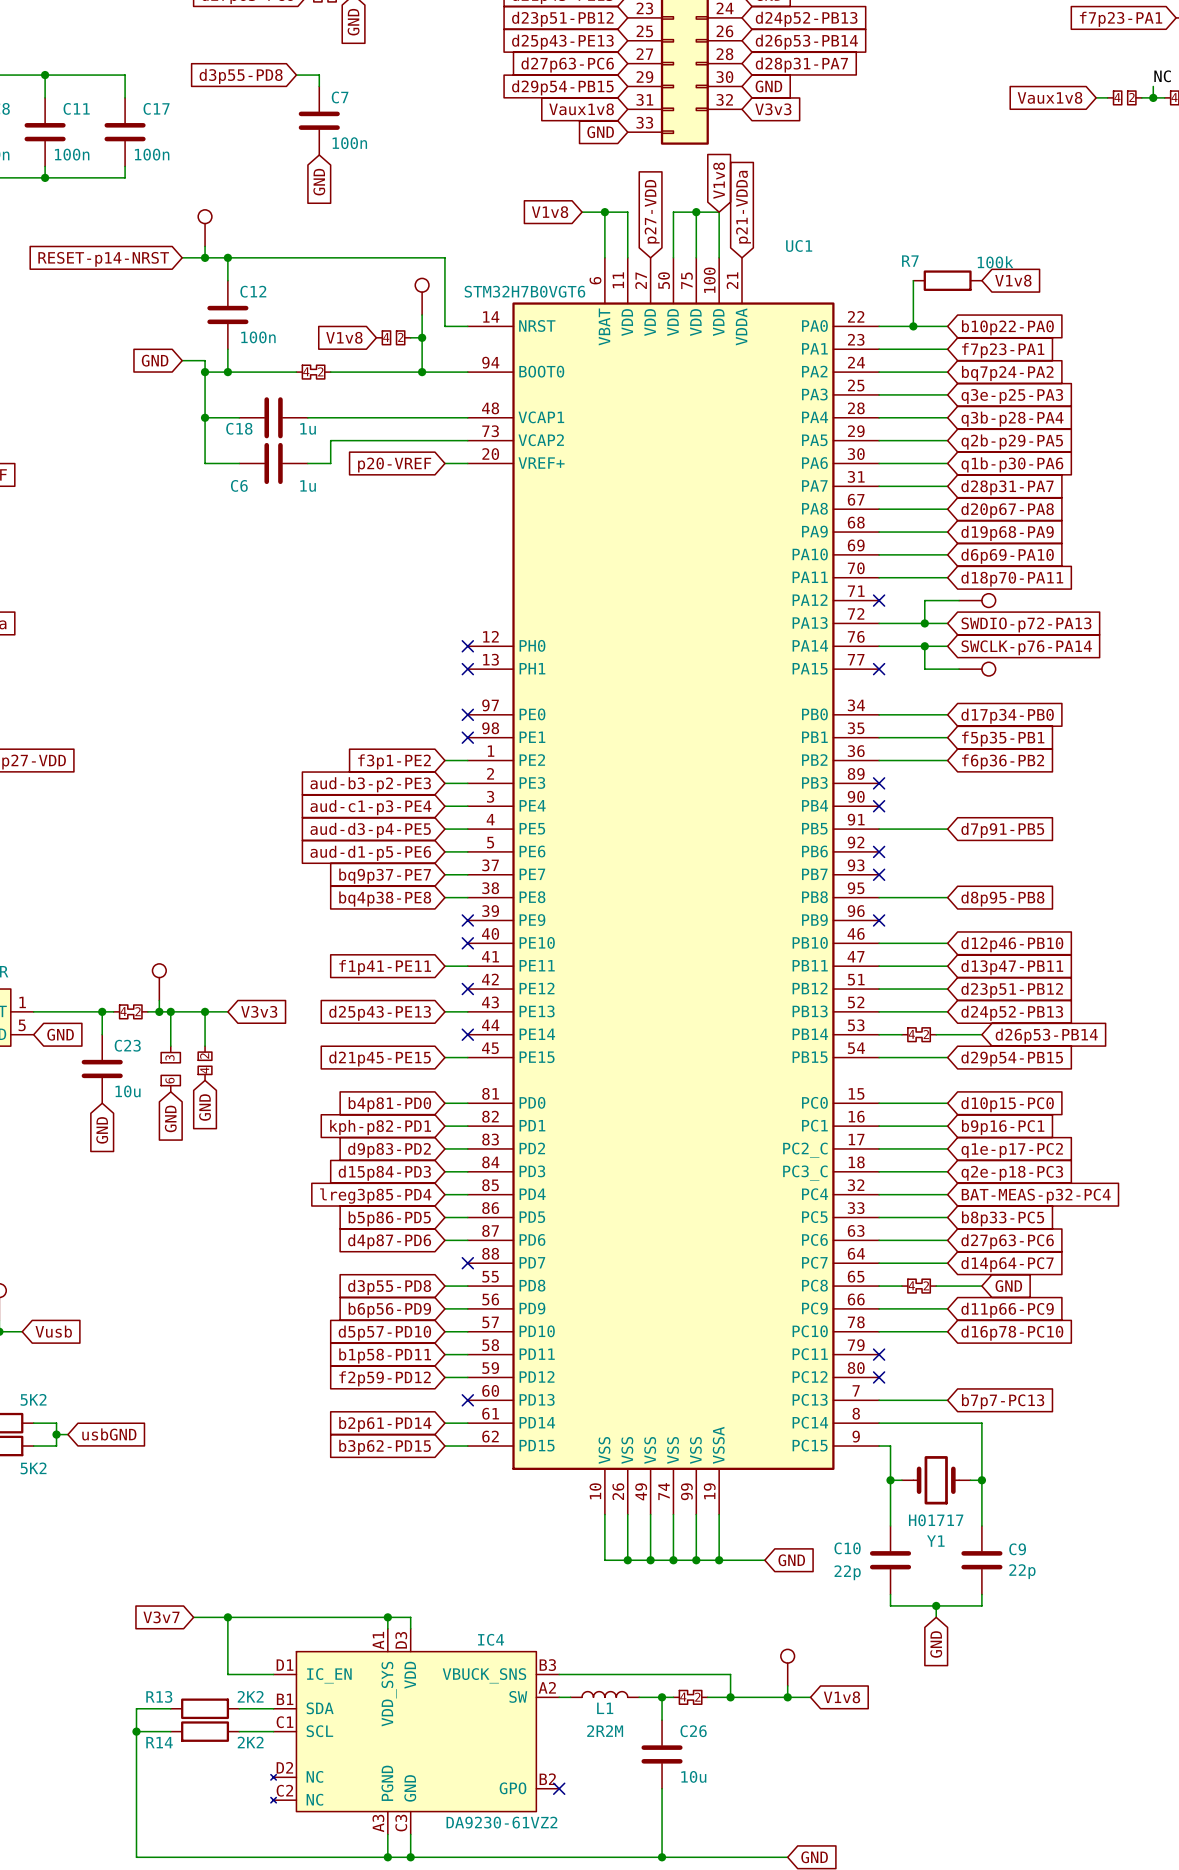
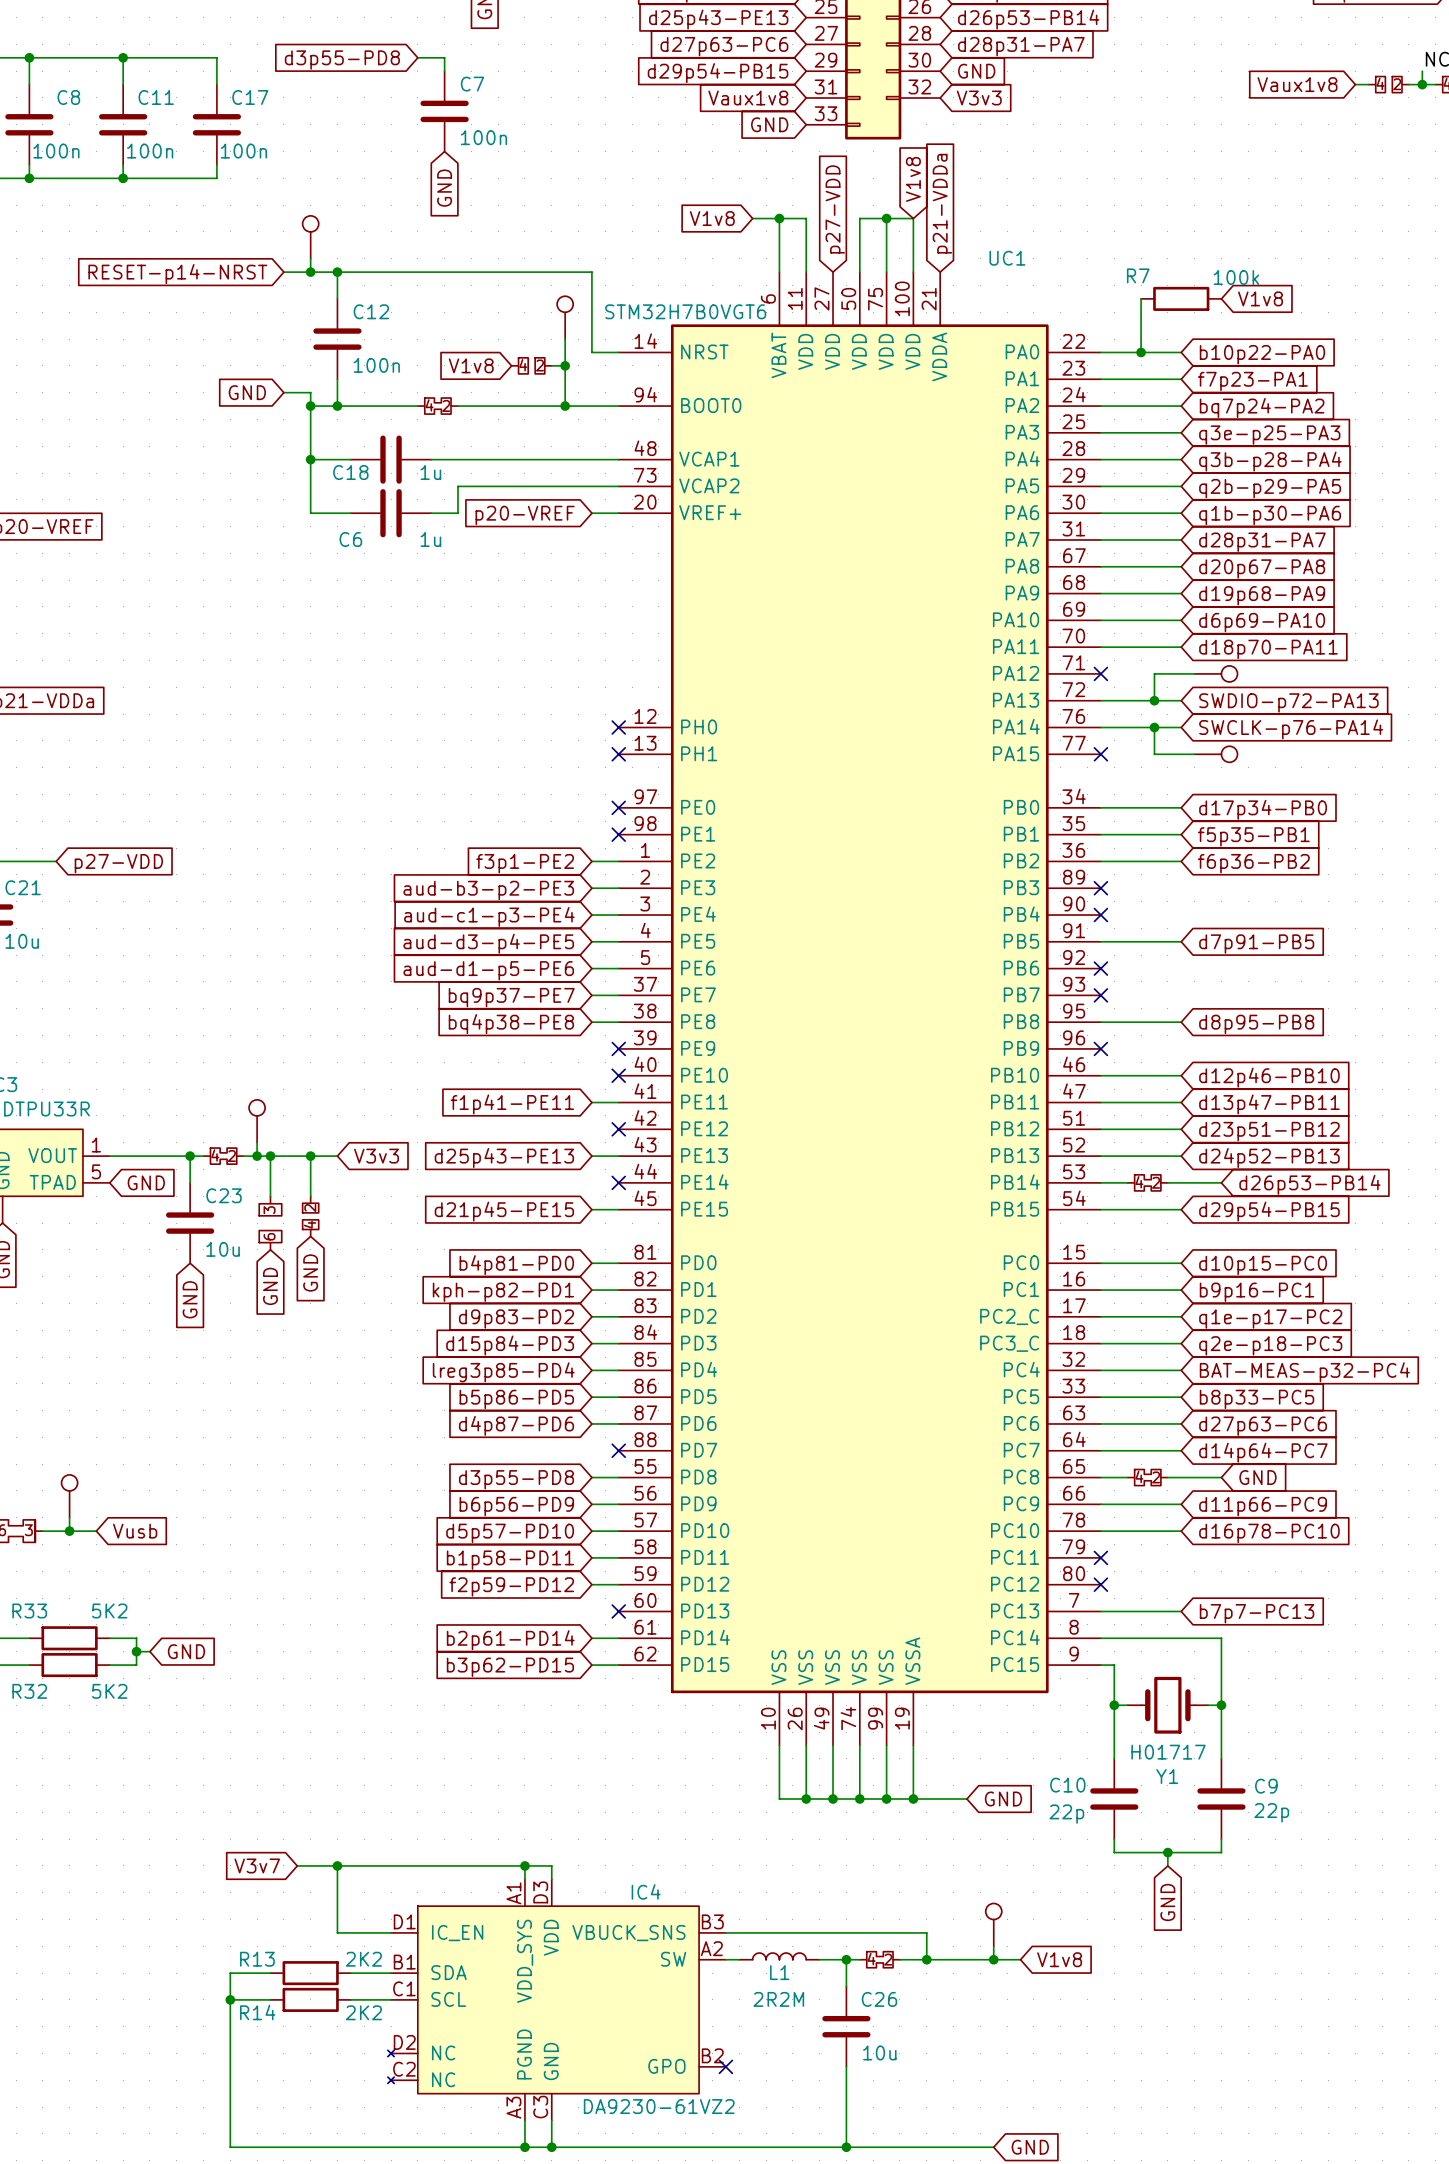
global label: usbGND (109, 1434) -> GND (186, 1651)

